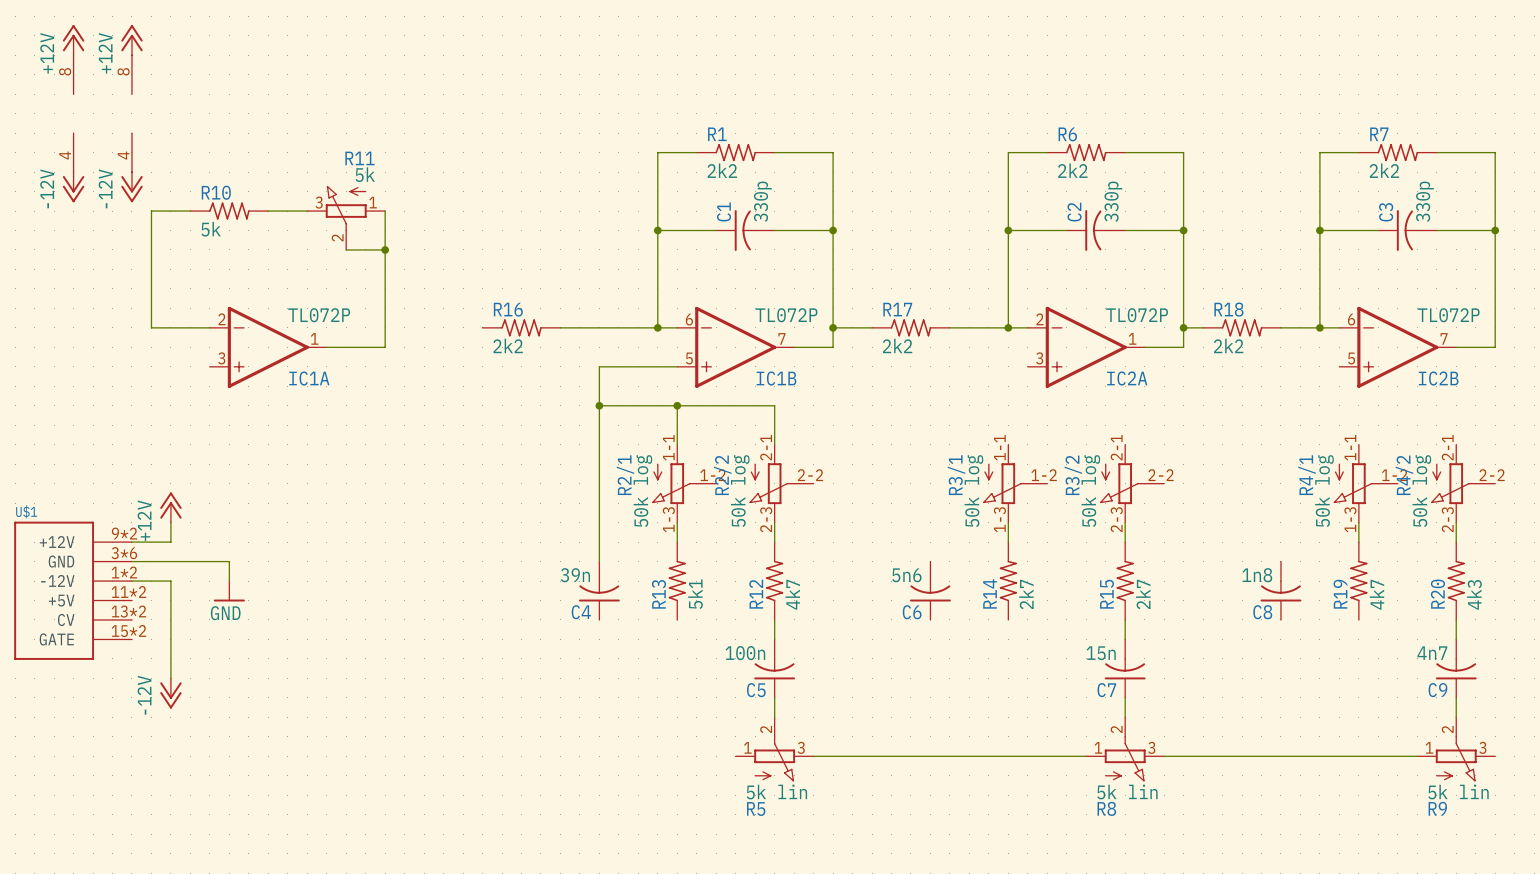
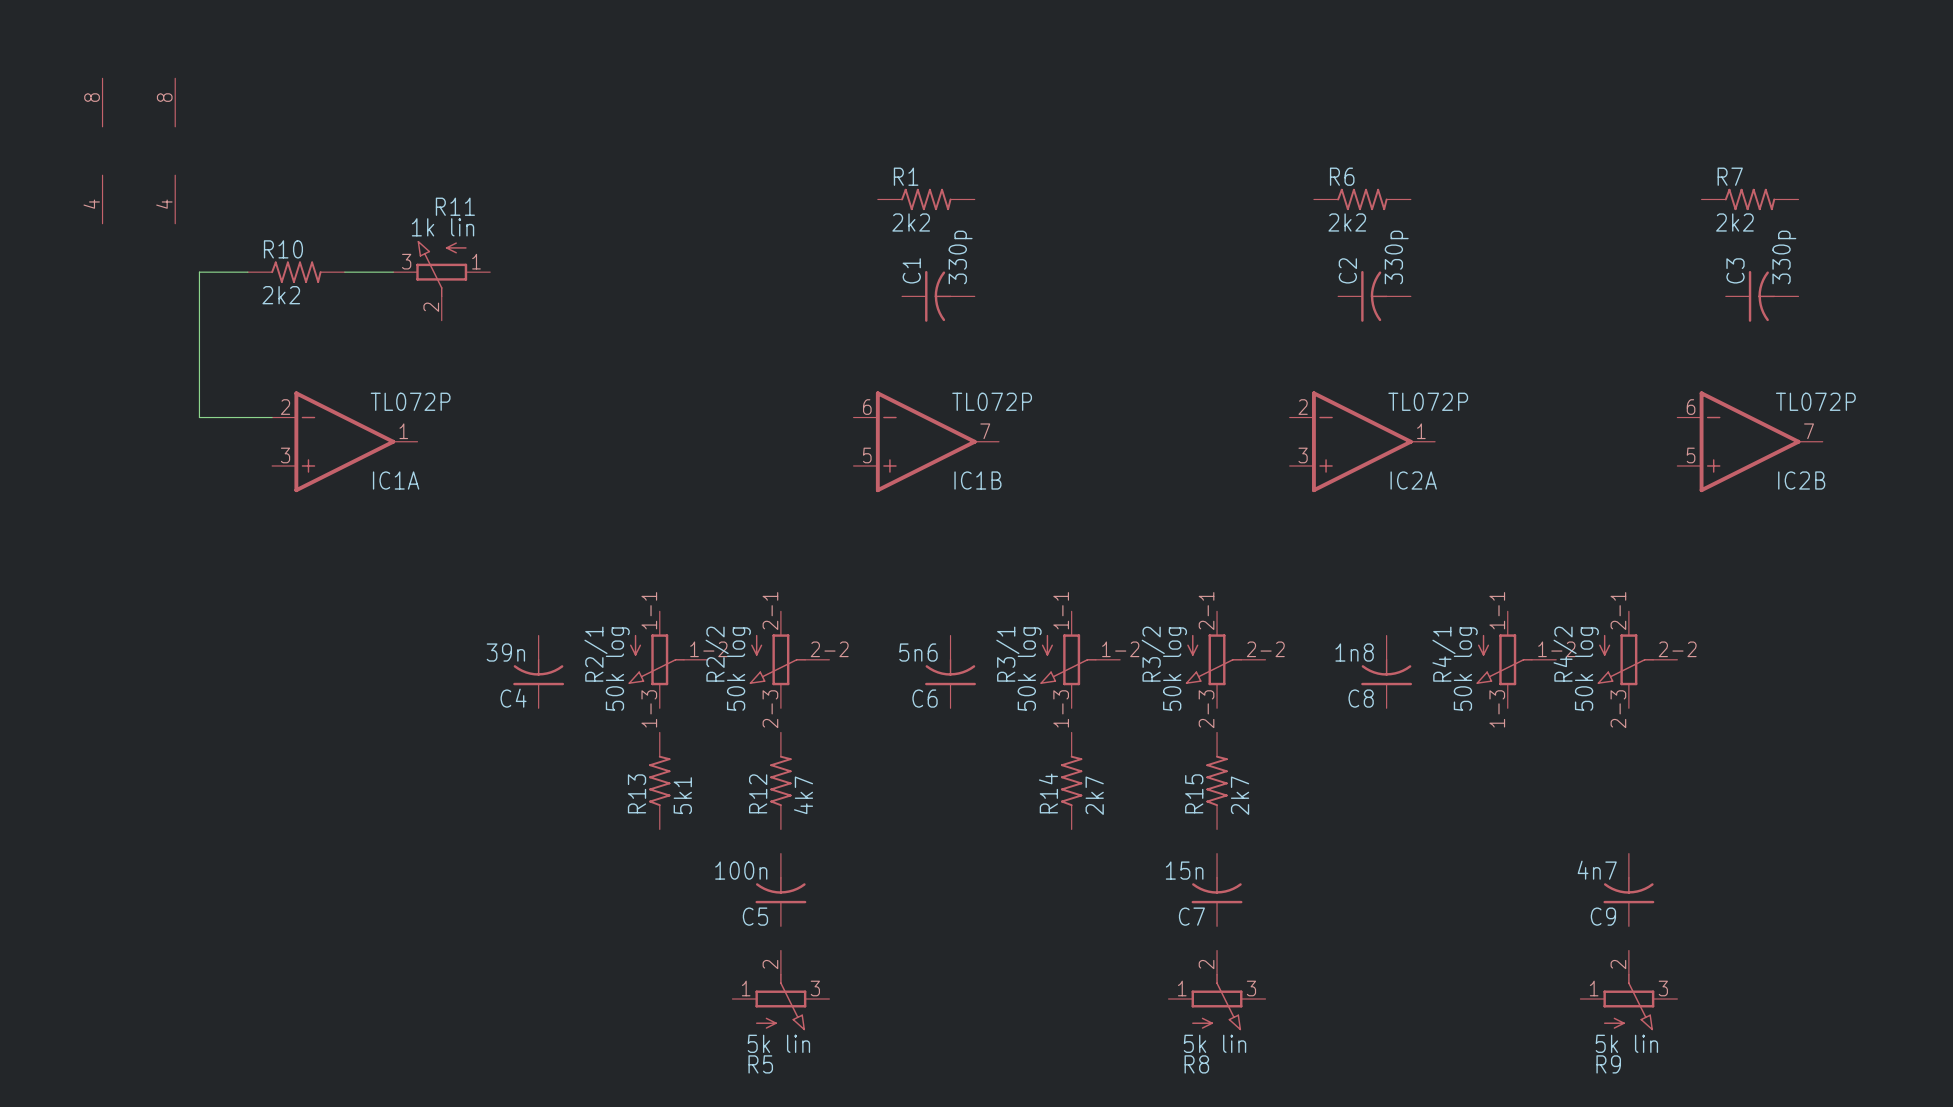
power symbol: +12V (73, 40) -> none
power symbol: +12V (131, 40) -> none
wire: (696, 152) (657, 152) (657, 327) -> none
wire: (774, 152) (833, 152) (833, 347) (794, 347) -> none
wire: (1047, 152) (1008, 152) (1008, 327) -> none
wire: (1125, 152) (1183, 152) (1183, 347) (1144, 347) -> none
wire: (1358, 152) (1319, 152) (1319, 327) -> none
wire: (1436, 152) (1495, 152) (1495, 347) (1456, 347) -> none
R11 value: 5k (365, 174) -> 1k lin (443, 227)
power symbol: -12V (73, 187) -> none
power symbol: -12V (131, 187) -> none
wire: (385, 211) (385, 347) (326, 347) -> none
R10 value: 5k (211, 229) -> 2k2 (281, 295)
wire: (657, 230) (716, 230) -> none
junction: (657, 230) -> none
wire: (774, 230) (833, 230) -> none
junction: (833, 230) -> none
wire: (1008, 230) (1066, 230) -> none
junction: (1008, 230) -> none
wire: (1125, 230) (1183, 230) -> none
junction: (1183, 230) -> none
wire: (1319, 230) (1378, 230) -> none
junction: (1319, 230) -> none
wire: (1436, 230) (1495, 230) -> none
junction: (1495, 230) -> none
wire: (346, 249) (385, 249) -> none
junction: (385, 249) -> none
R16: 2k2 (521, 327) -> none
wire: (560, 327) (677, 327) -> none
junction: (657, 327) -> none
wire: (833, 327) (872, 327) -> none
junction: (833, 327) -> none
R17: 2k2 (910, 327) -> none
wire: (949, 327) (1027, 327) -> none
junction: (1008, 327) -> none
wire: (1183, 327) (1203, 327) -> none
junction: (1183, 327) -> none
R18: 2k2 (1242, 327) -> none
wire: (1280, 327) (1339, 327) -> none
junction: (1319, 327) -> none
wire: (677, 366) (599, 366) (599, 561) -> none
wire: (599, 405) (774, 405) (774, 444) -> none
junction: (599, 405) -> none
wire: (677, 405) (677, 444) -> none
junction: (677, 405) -> none
R2/1 position: (684, 483) -> (668, 659)
R2/2 position: (781, 483) -> (789, 659)
R3/1 position: (1015, 483) -> (1080, 659)
R3/2 position: (1132, 483) -> (1225, 659)
R4/1 position: (1365, 483) -> (1516, 659)
R4/2 position: (1463, 483) -> (1637, 659)
power symbol: +12V (170, 507) -> none
wire: (170, 522) (170, 542) (131, 542) -> none
wire: (677, 522) (677, 542) -> none
wire: (774, 522) (774, 542) -> none
wire: (1008, 522) (1008, 542) -> none
wire: (1125, 522) (1125, 542) -> none
wire: (1358, 522) (1358, 542) -> none
wire: (1456, 522) (1456, 542) -> none
wire: (131, 561) (229, 561) (229, 581) -> none
wire: (131, 581) (170, 581) (170, 678) -> none
R13 position: (677, 581) -> (659, 780)
R12 position: (774, 581) -> (780, 780)
R14 position: (1008, 581) -> (1071, 780)
R15 position: (1125, 581) -> (1217, 780)
R19: 4k7 (1358, 581) -> none
R20: 4k3 (1456, 581) -> none
U$1: (73, 590) -> none
C4 position: (599, 590) -> (538, 671)
C6 position: (930, 590) -> (950, 671)
C8 position: (1280, 590) -> (1386, 671)
power symbol: GND (229, 591) -> none
wire: (774, 619) (774, 639) -> none
wire: (1125, 619) (1125, 639) -> none
wire: (1456, 619) (1456, 639) -> none
C5 position: (774, 668) -> (780, 889)
C7 position: (1125, 668) -> (1217, 889)
C9 position: (1456, 668) -> (1628, 889)
power symbol: -12V (170, 693) -> none
wire: (774, 697) (774, 717) -> none
wire: (1125, 697) (1125, 717) -> none
wire: (1456, 697) (1456, 717) -> none
R5 position: (774, 749) -> (780, 990)
R8 position: (1125, 749) -> (1217, 990)
R9 position: (1456, 749) -> (1628, 990)
wire: (813, 756) (1086, 756) -> none
wire: (1164, 756) (1417, 756) -> none

